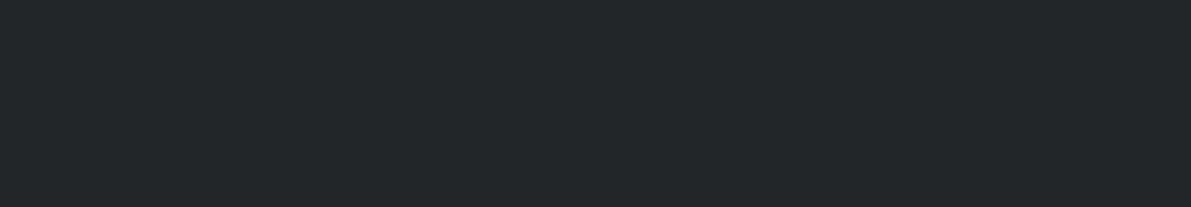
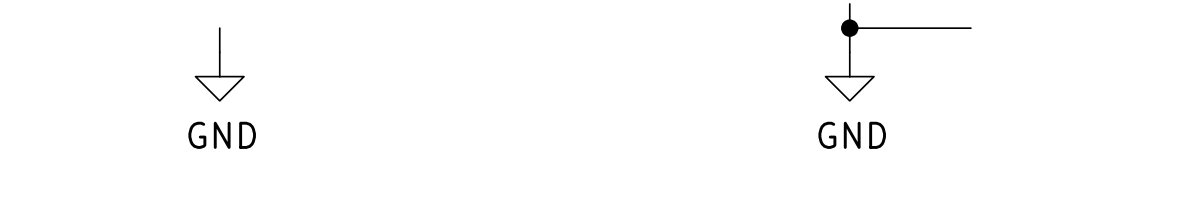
wire: none -> (849, 3) (849, 52)
wire: none -> (219, 28) (219, 52)
wire: none -> (849, 28) (970, 28)
junction: none -> (849, 28)
power symbol: none -> GND (219, 76)
power symbol: none -> GND (849, 76)

